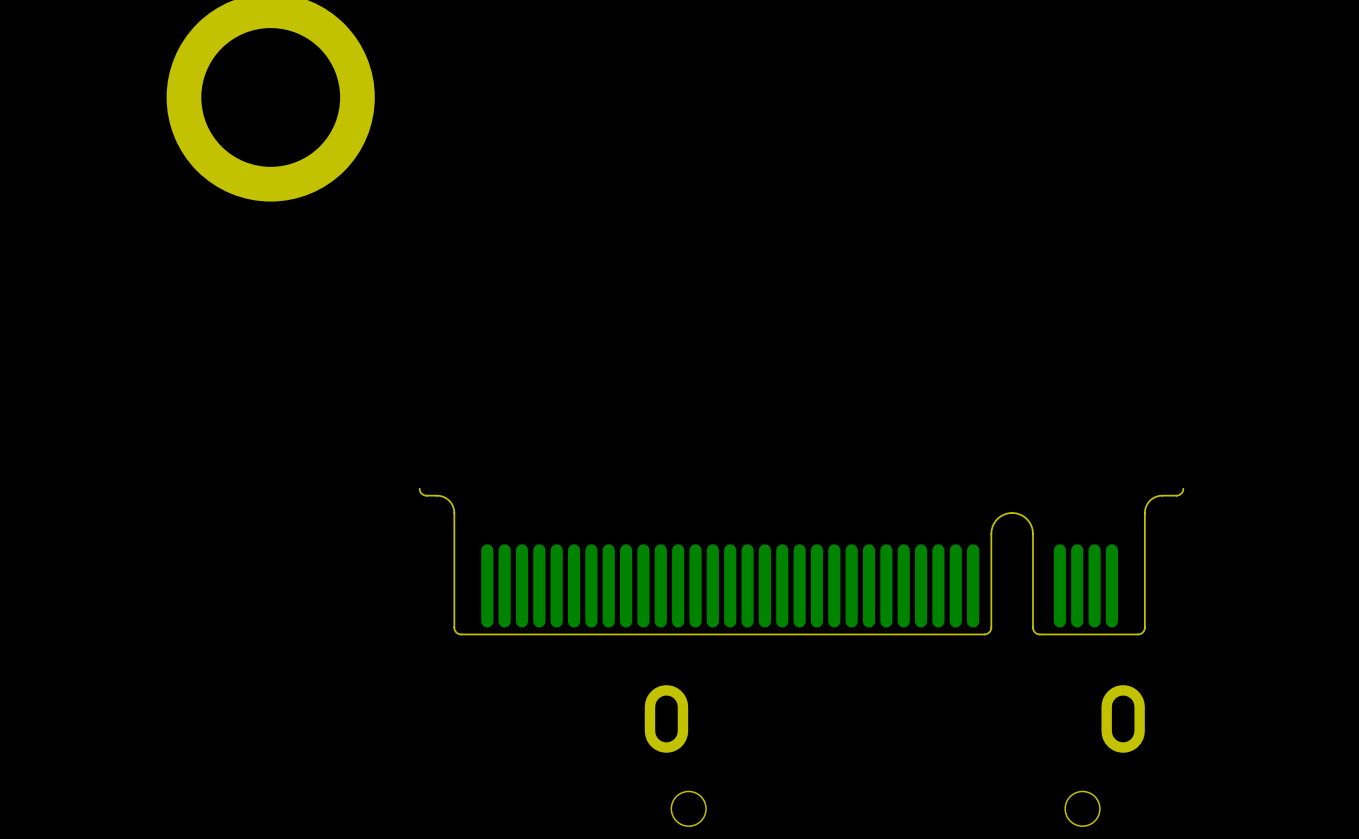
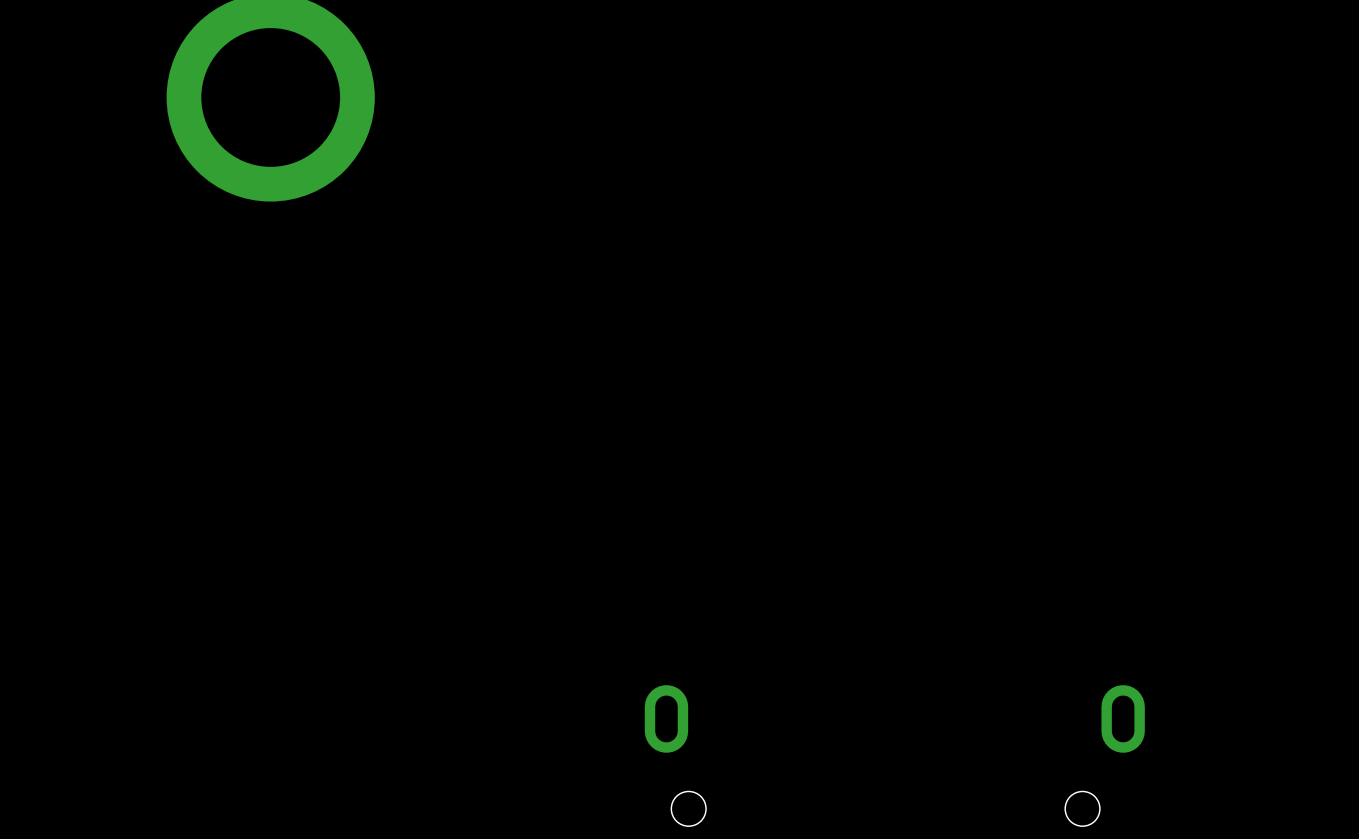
part: (801, 561) -> none

